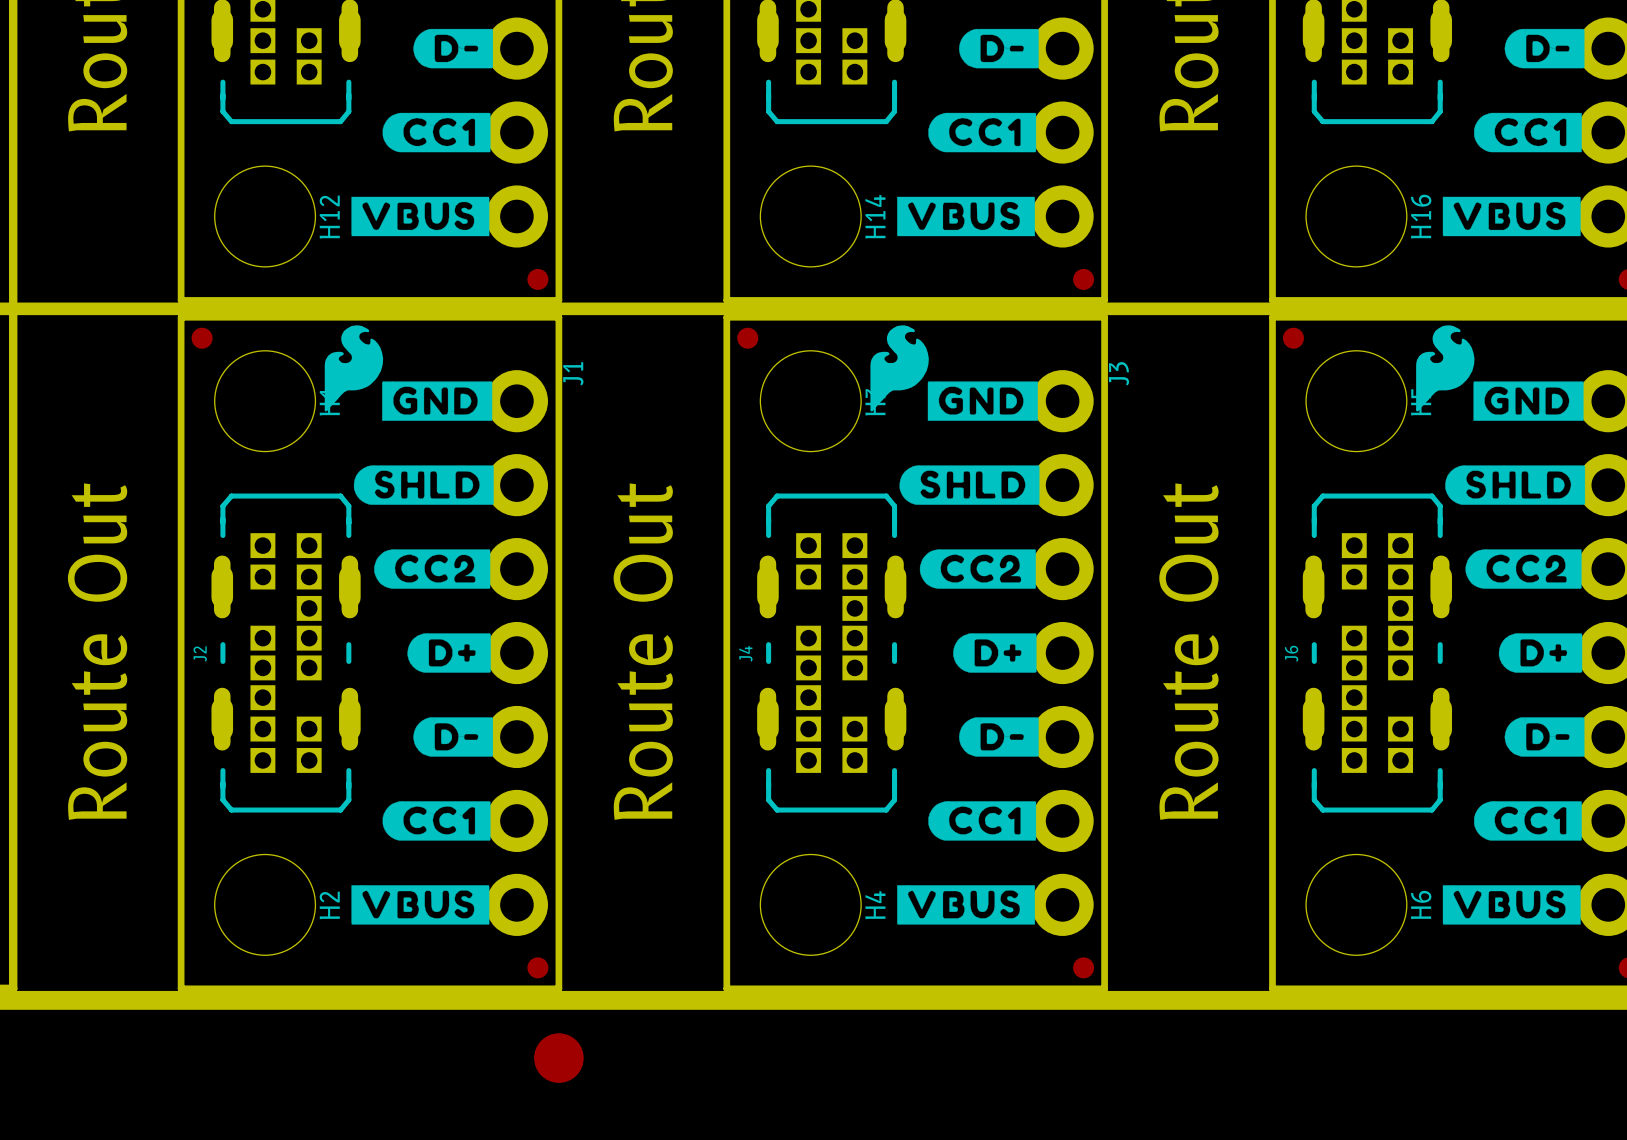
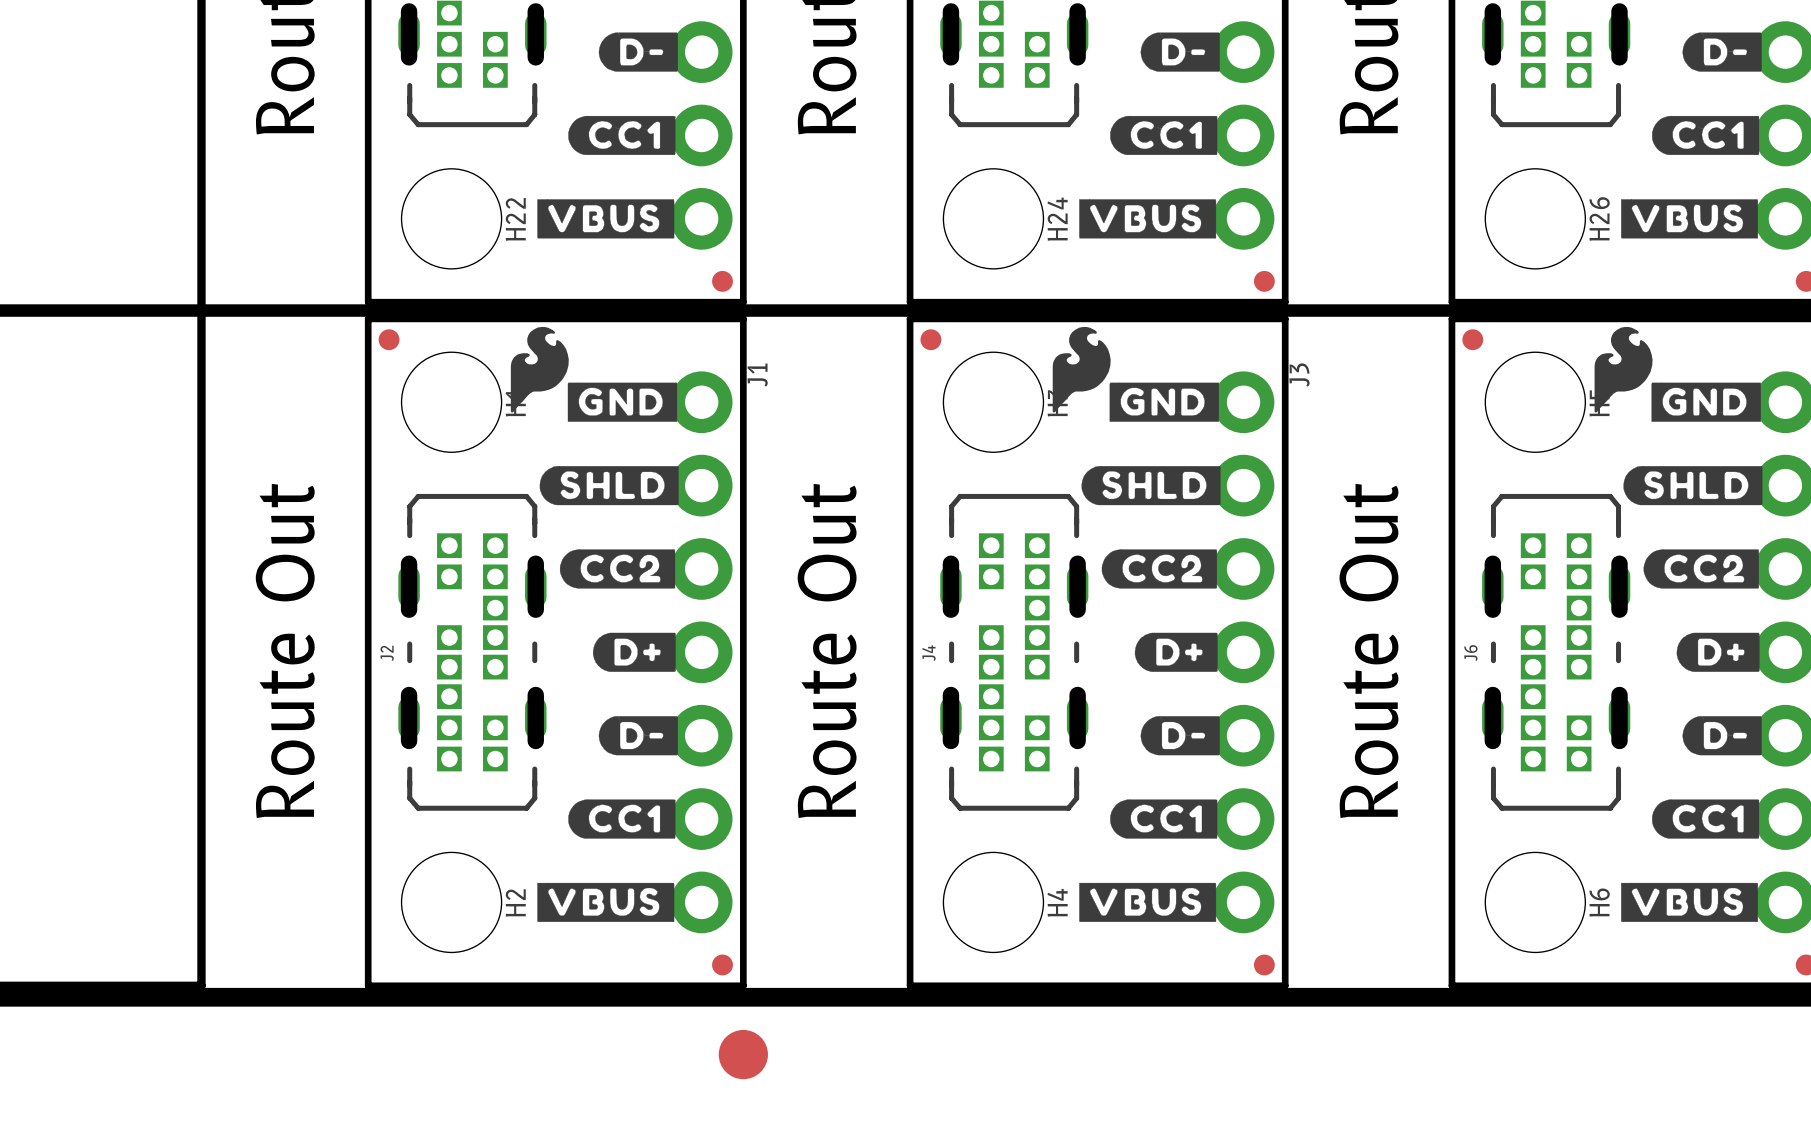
H14 name: H14 (875, 216) -> H24 (1057, 219)
H16 name: H16 (1421, 216) -> H26 (1599, 218)
H12 name: H12 (329, 217) -> H22 (515, 219)

